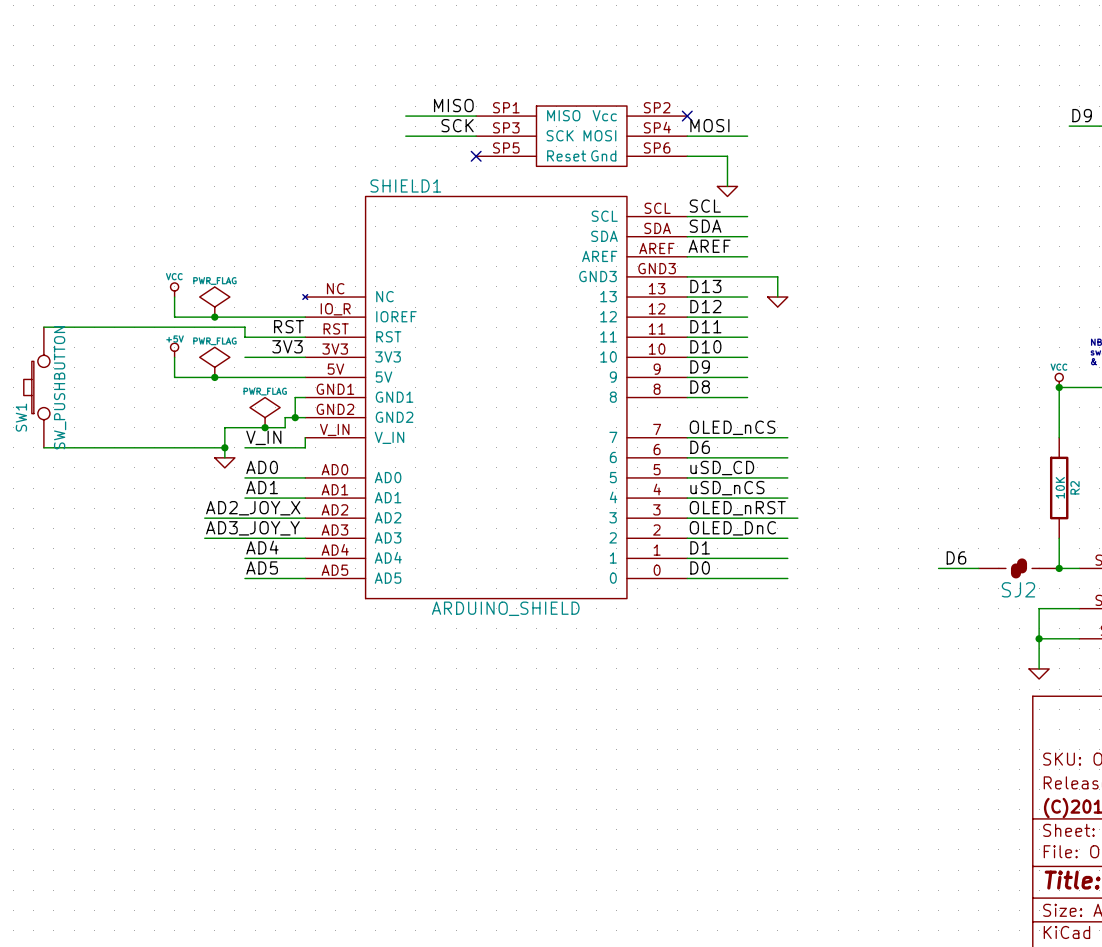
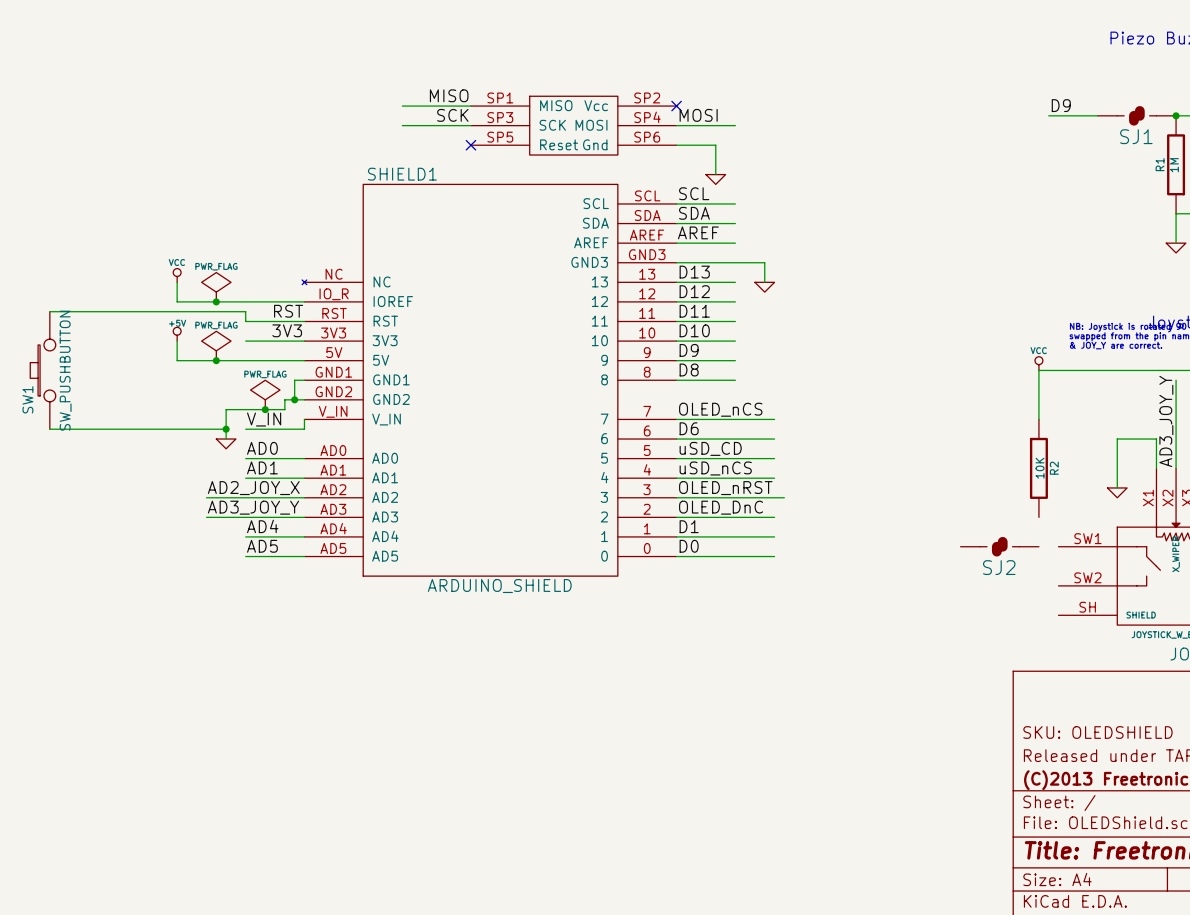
junction: (1059, 387) -> none
wire: (1059, 538) (1059, 568) (1079, 568) -> none
label: D6 (956, 557) -> none
wire: (938, 568) (978, 568) -> none
junction: (1059, 568) -> none
wire: (1079, 608) (1039, 608) (1039, 668) -> none
wire: (1039, 638) (1079, 638) -> none
junction: (1039, 638) -> none
power symbol: (1039, 673) -> none

